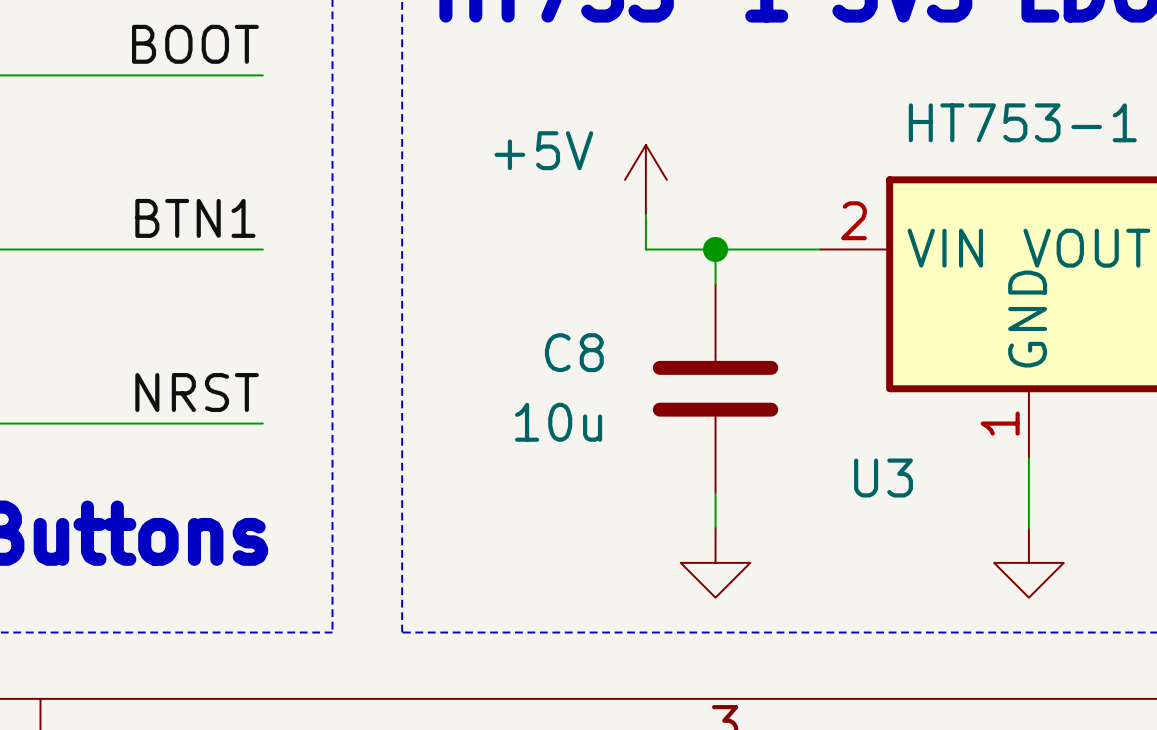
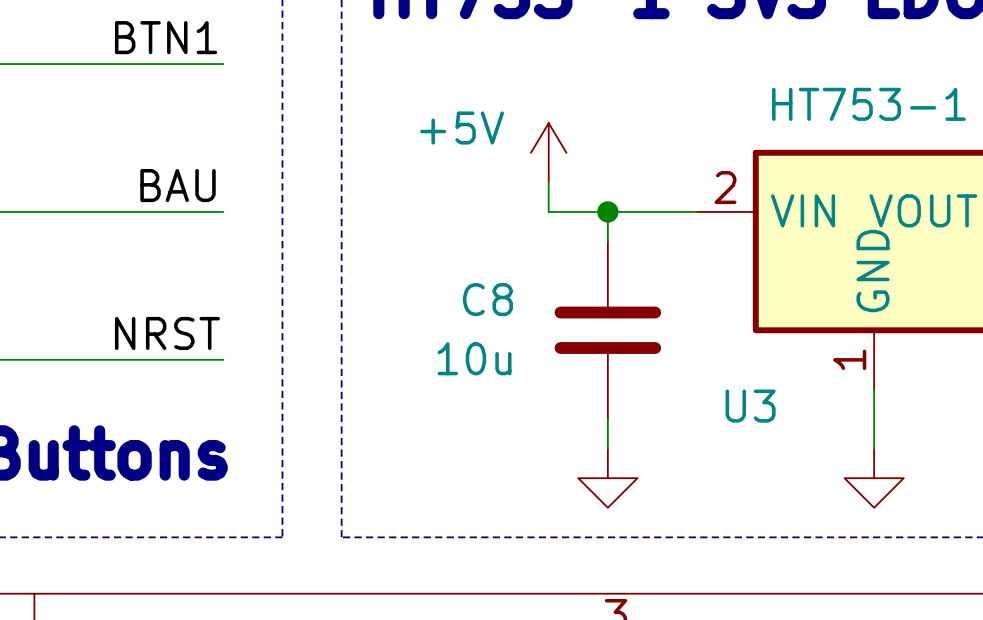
label: BOOT (195, 44) -> BTN1 (166, 37)
label: BTN1 (195, 218) -> BAU (178, 185)

